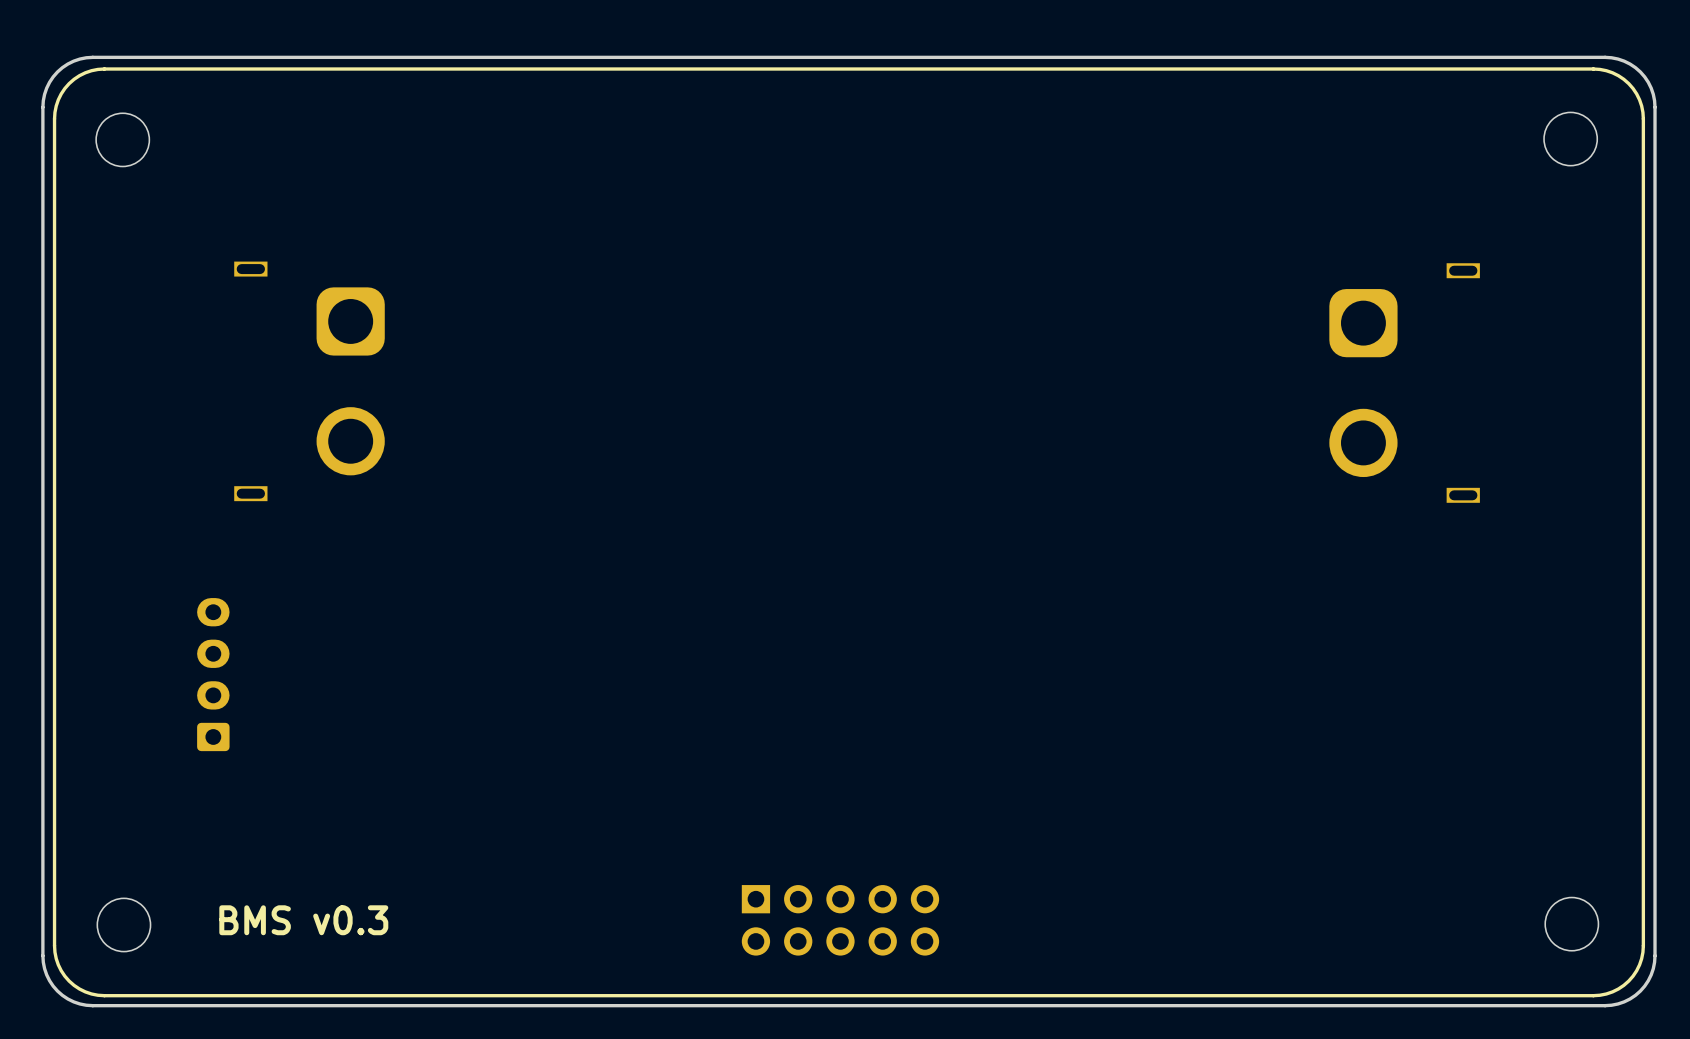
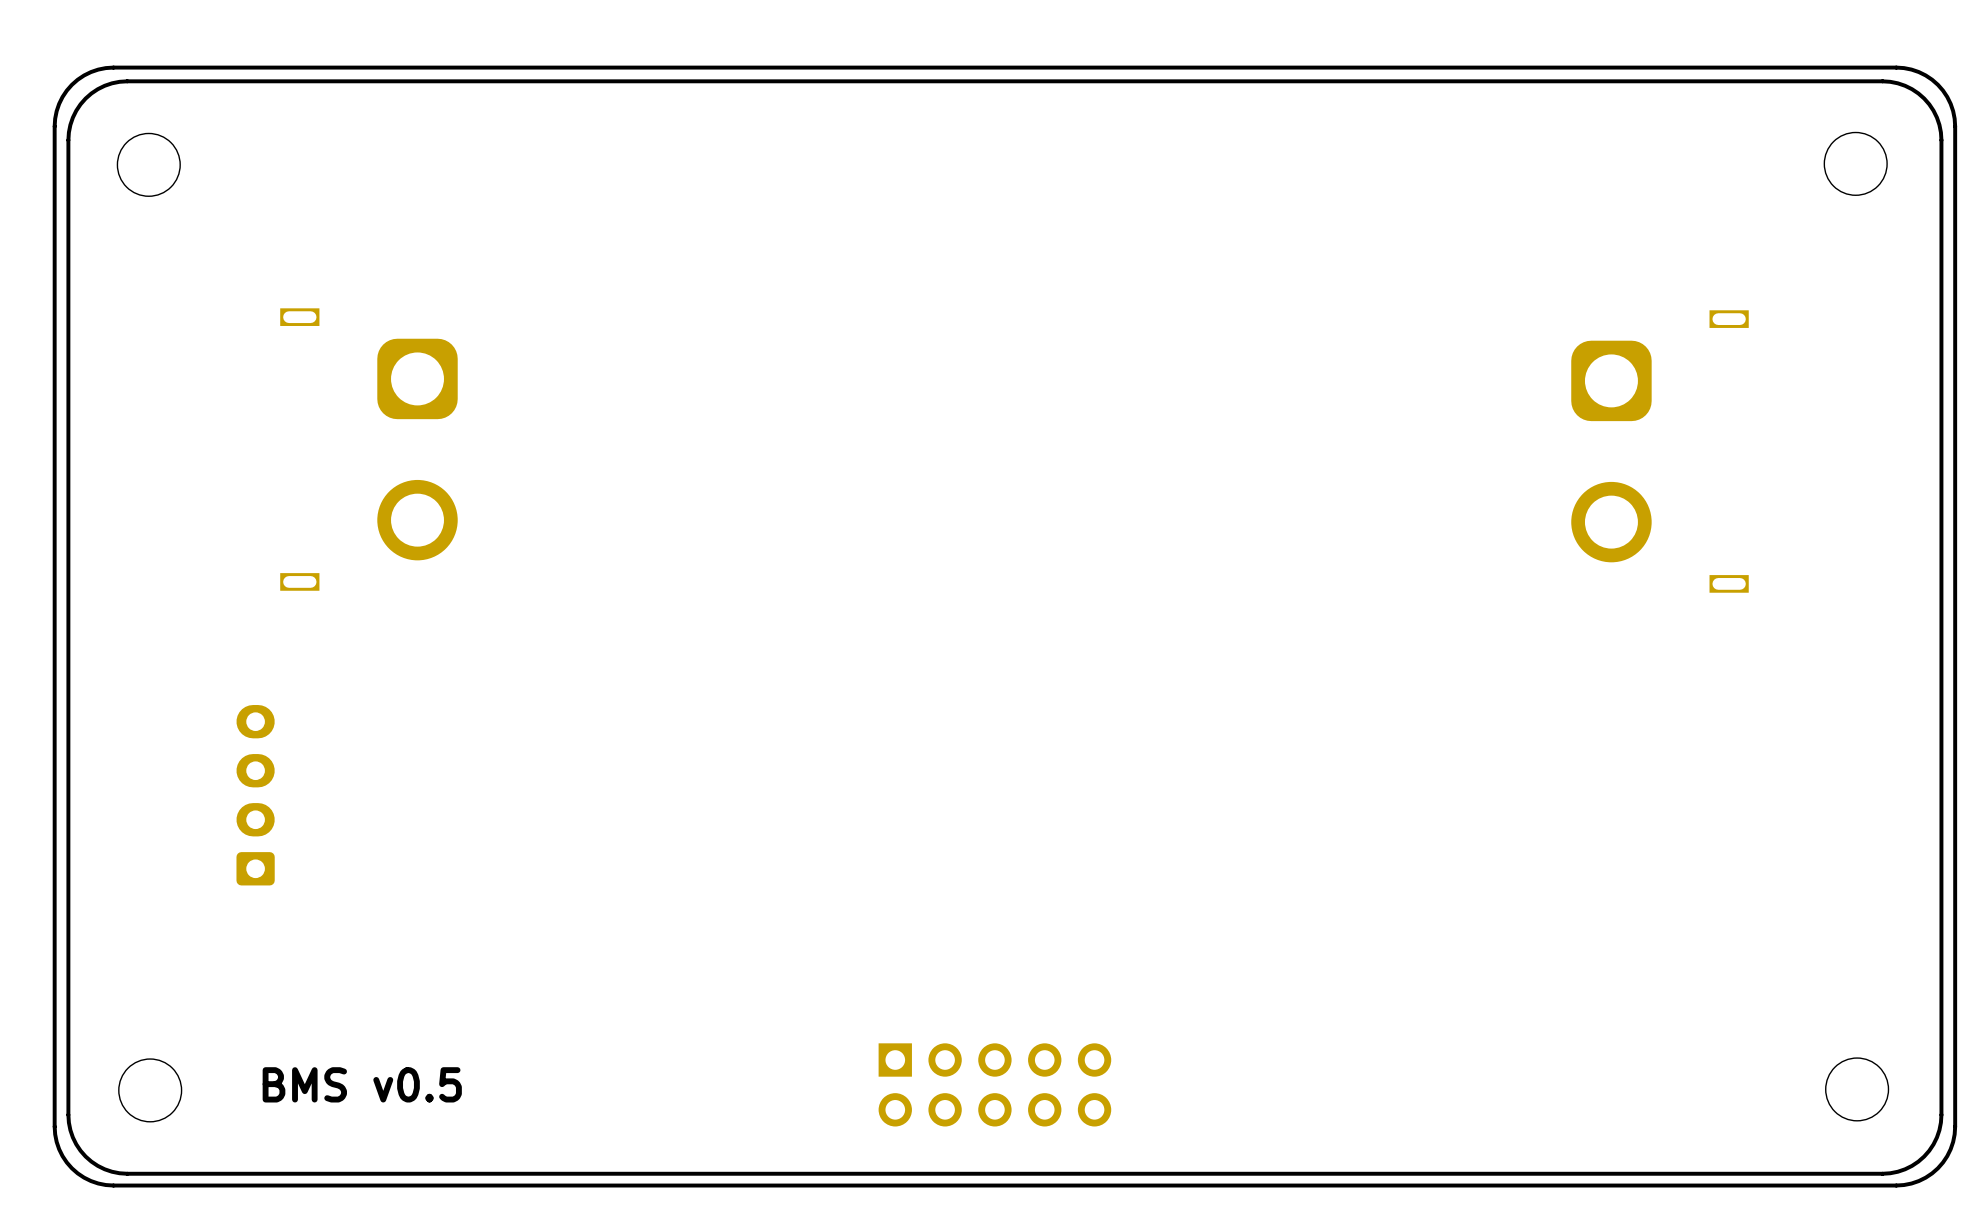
text: BMS v0.3 (303, 920) -> BMS v0.5 (362, 1084)

